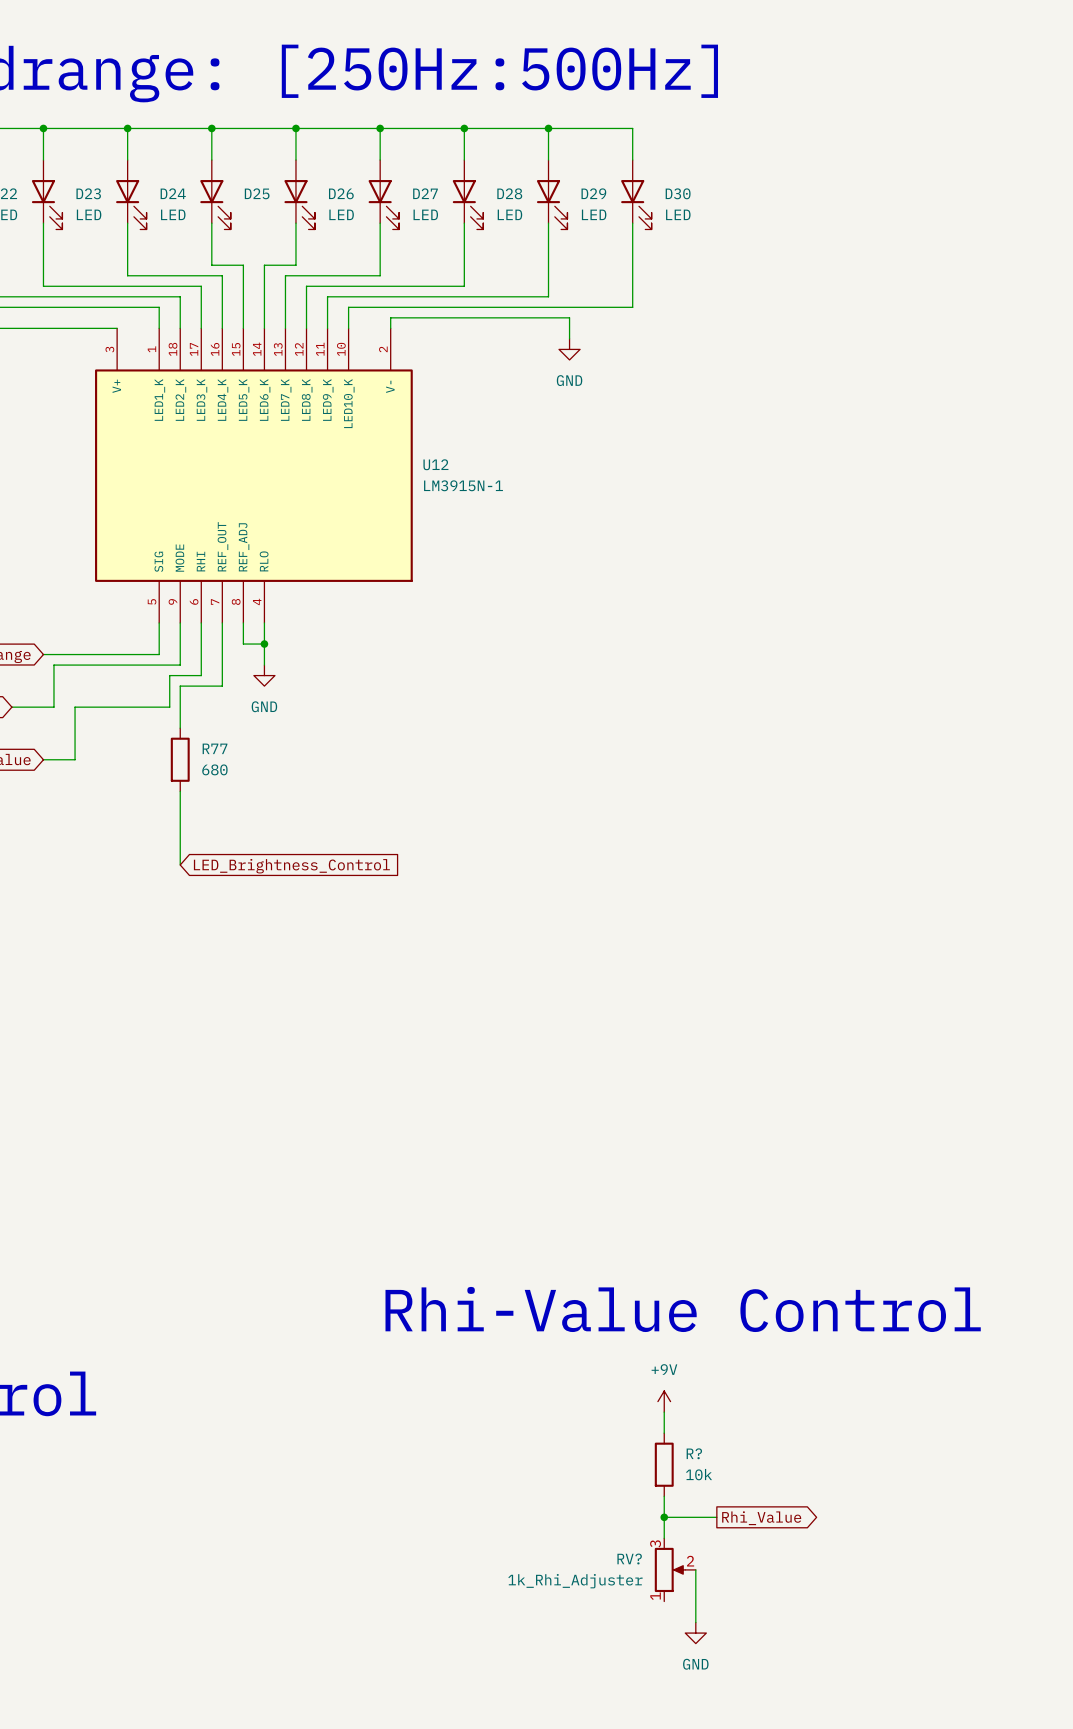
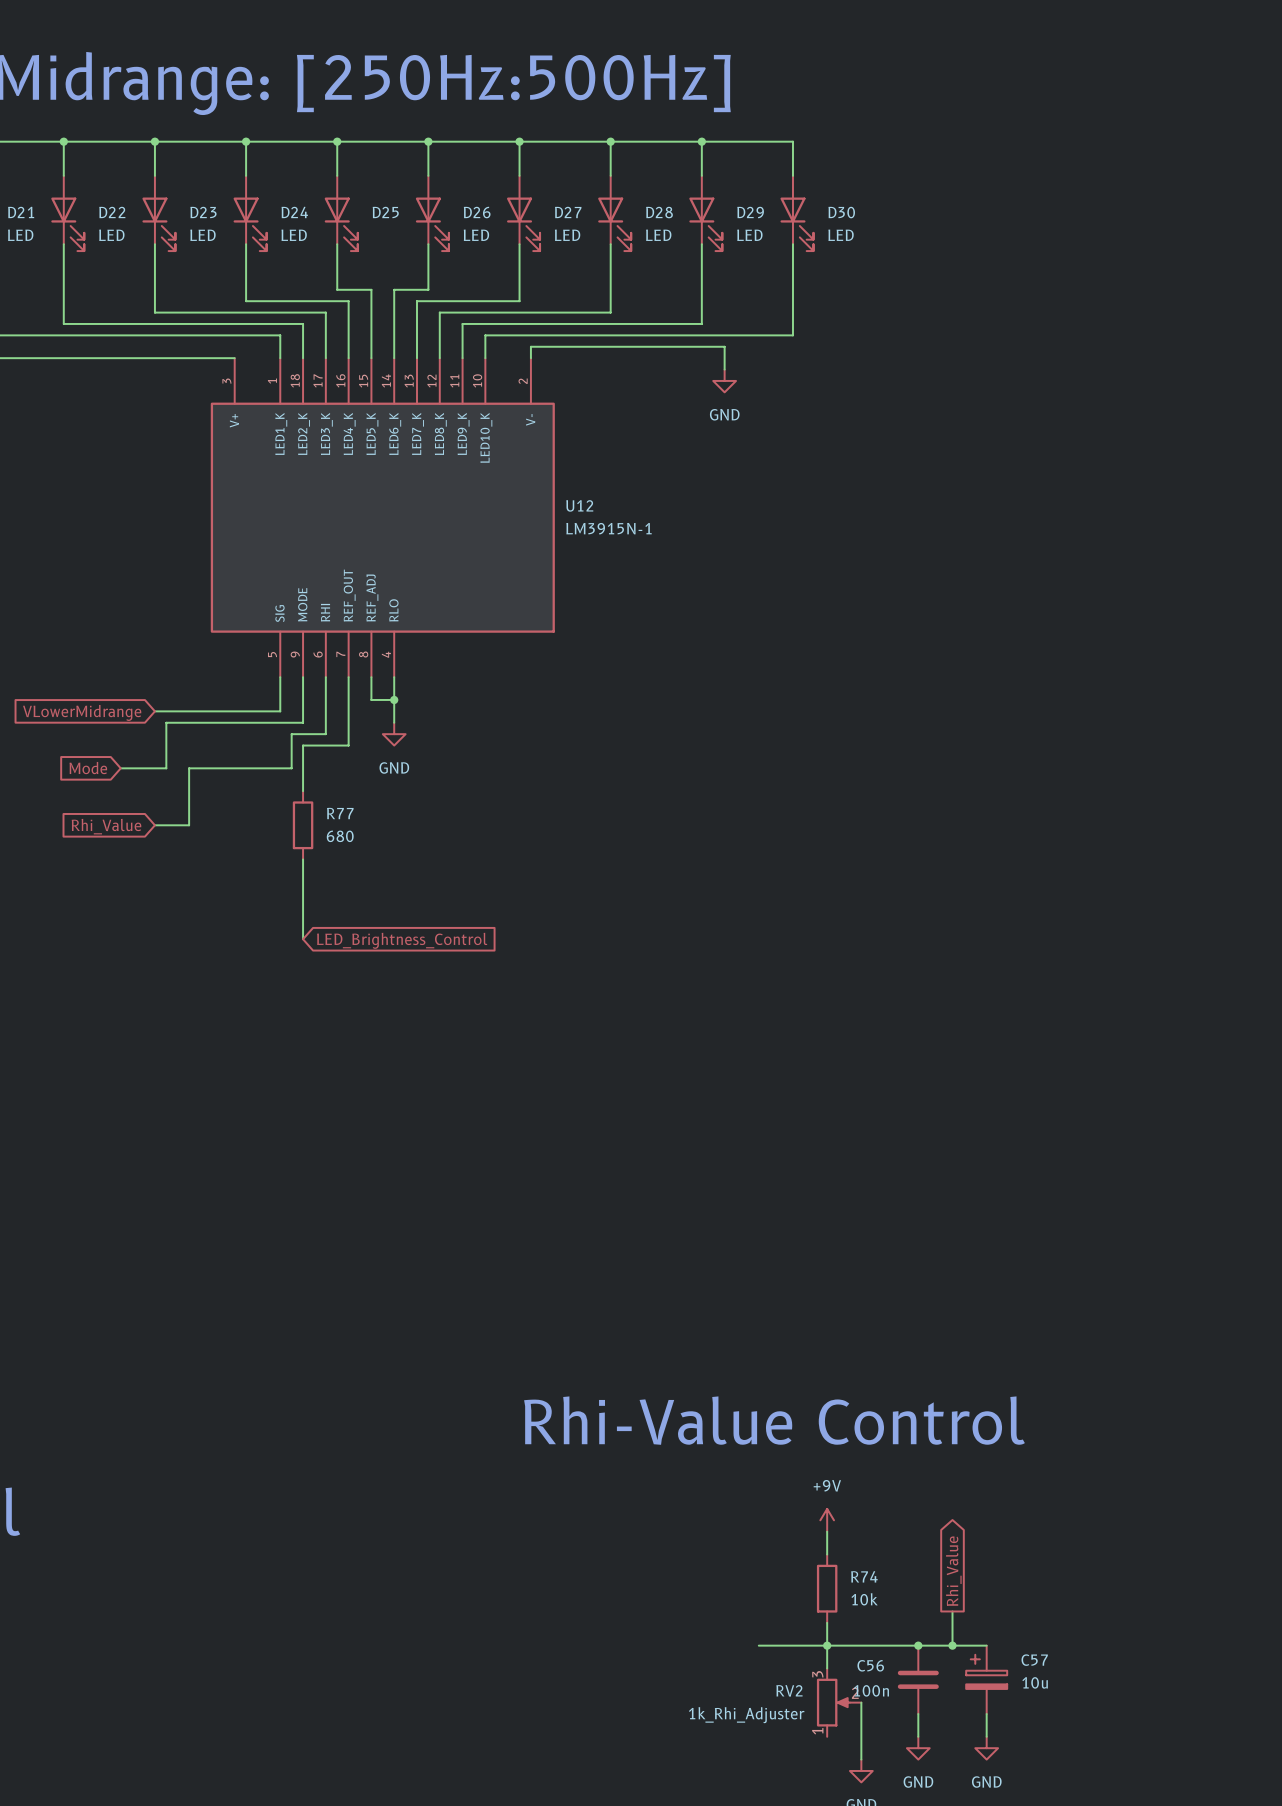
R? name: R? (694, 1453) -> R74 (864, 1576)
wire: none -> (952, 1611) (952, 1645)
wire: none -> (758, 1645) (827, 1645)
wire: none -> (884, 1645) (986, 1645)
junction: none -> (918, 1645)
junction: none -> (952, 1645)
global label rotation: 0° (761, 1518) -> 90° counterclockwise (953, 1571)
C56: none -> 100n (918, 1679)
C57: none -> 10u (986, 1679)
RV? name: RV? (629, 1559) -> RV2 (789, 1690)
wire: none -> (918, 1714) (918, 1736)
wire: none -> (986, 1714) (986, 1736)
power symbol: none -> GND (918, 1748)
power symbol: none -> GND (986, 1748)

